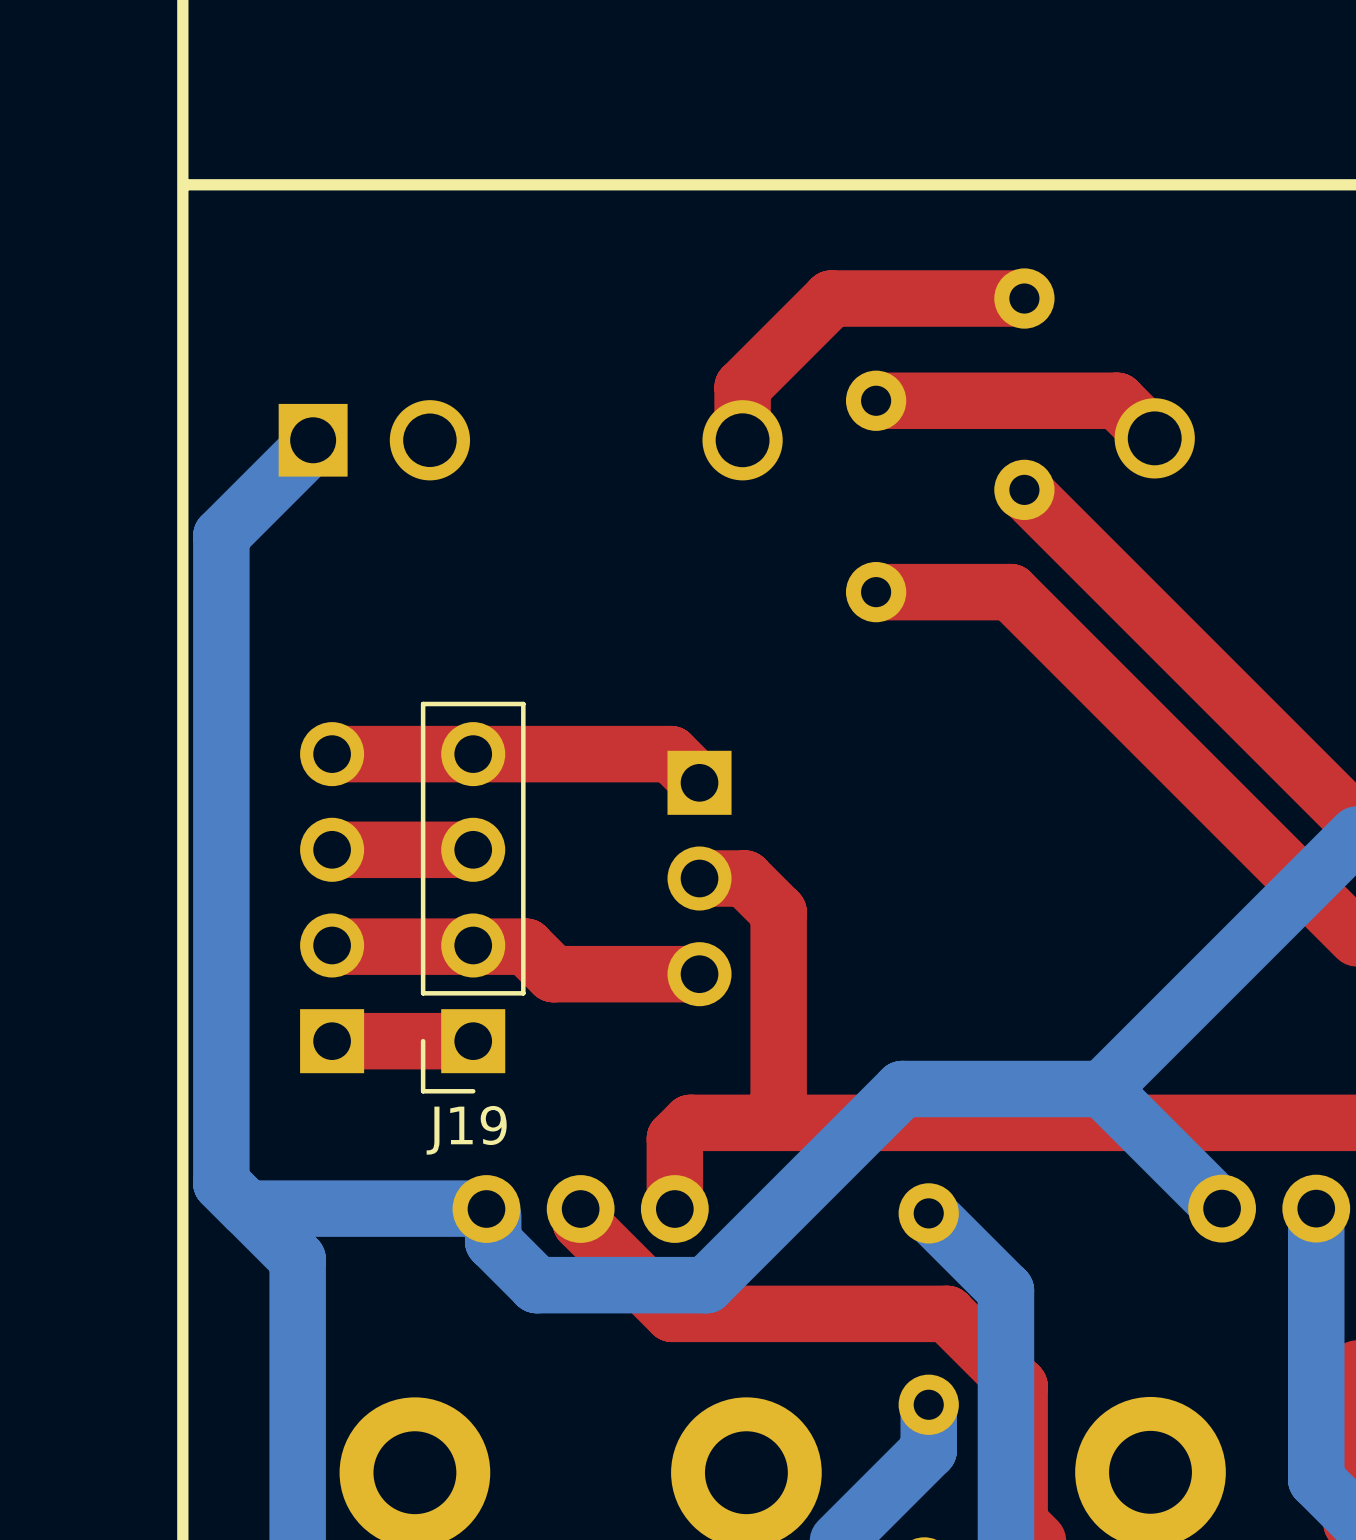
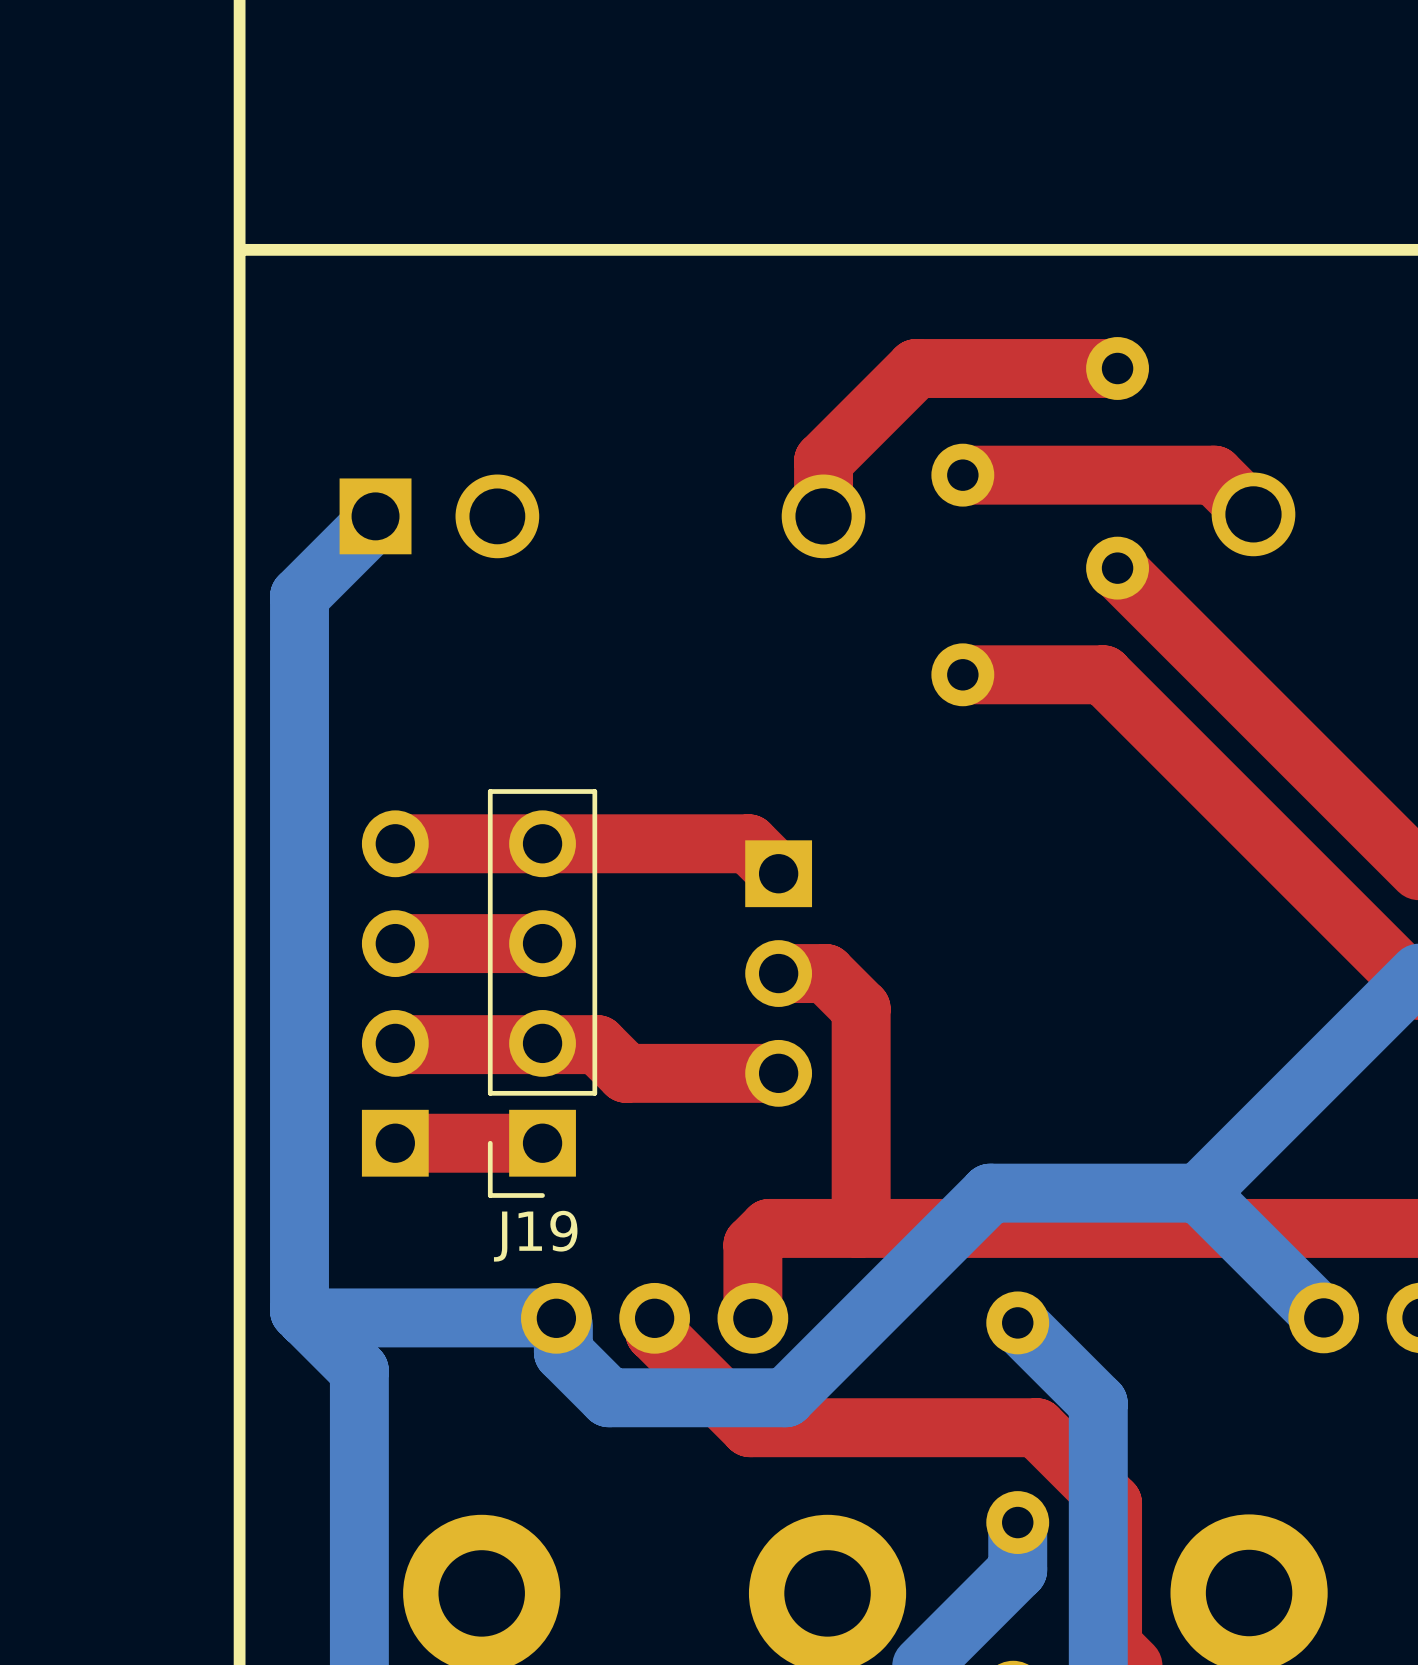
bottom track: (240, 516) (221, 535) (221, 1182) (240, 1201) -> (299, 596) (299, 1310)

